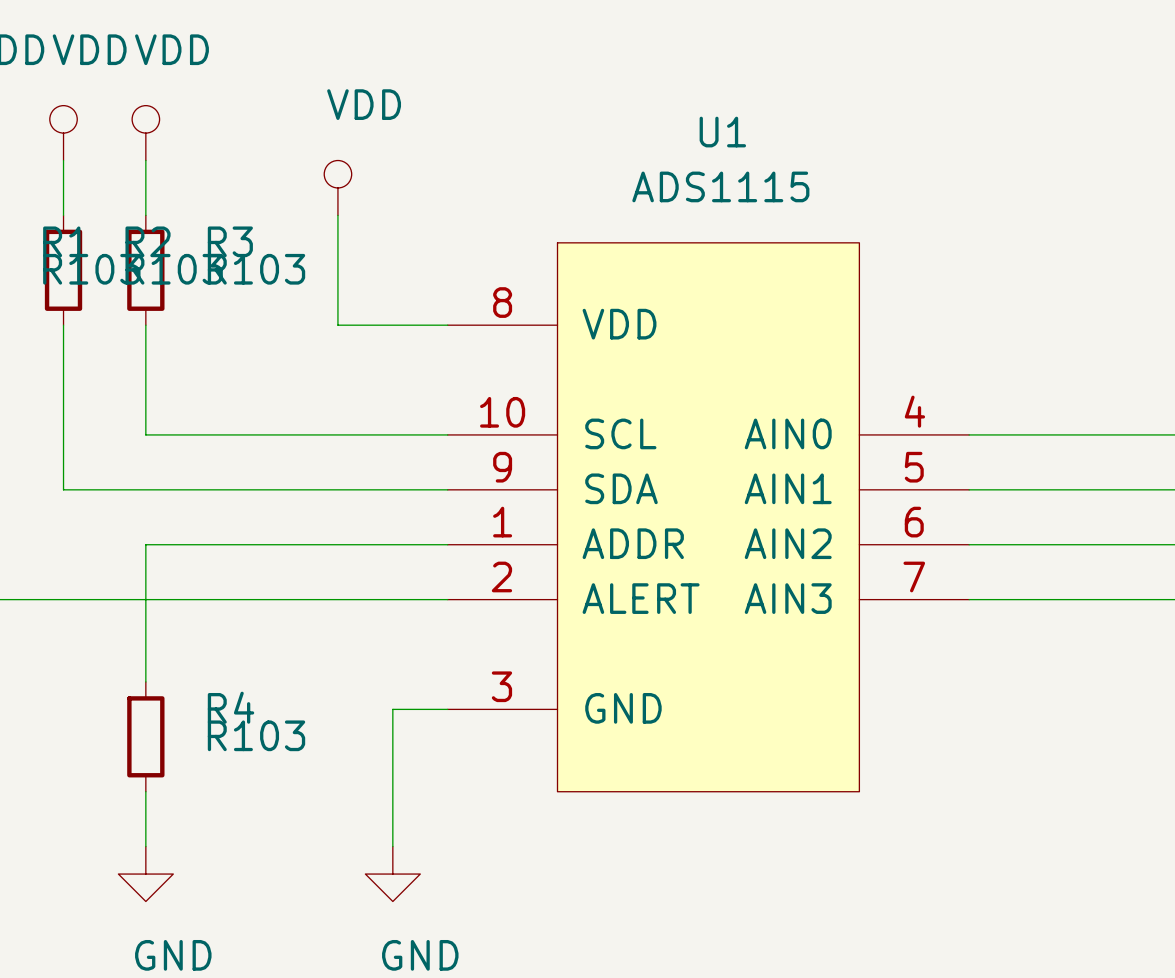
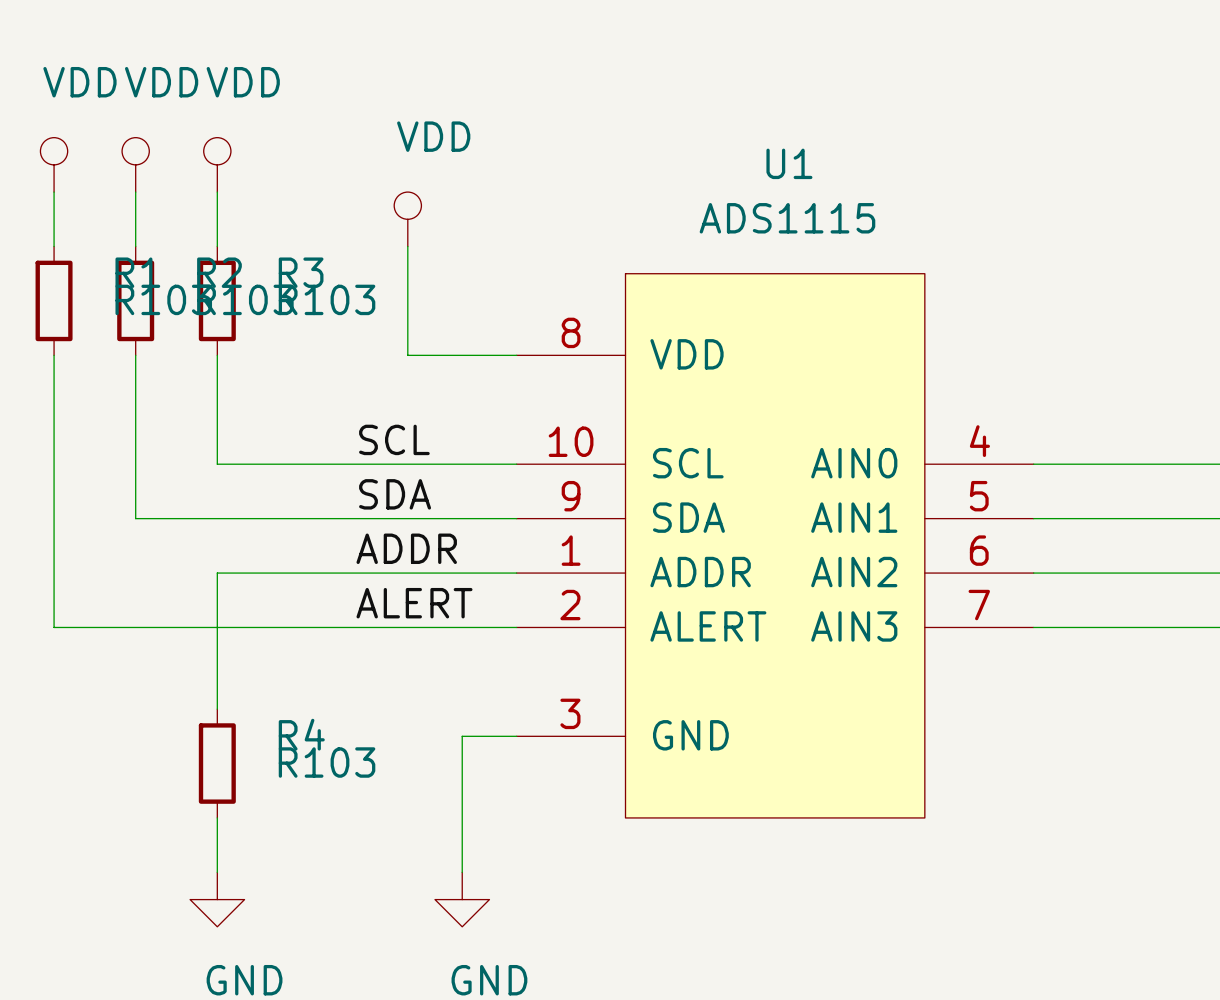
label: none -> SCL (394, 439)
label: none -> SDA (395, 494)
label: none -> ADDR (406, 548)
label: none -> ALERT (414, 603)

